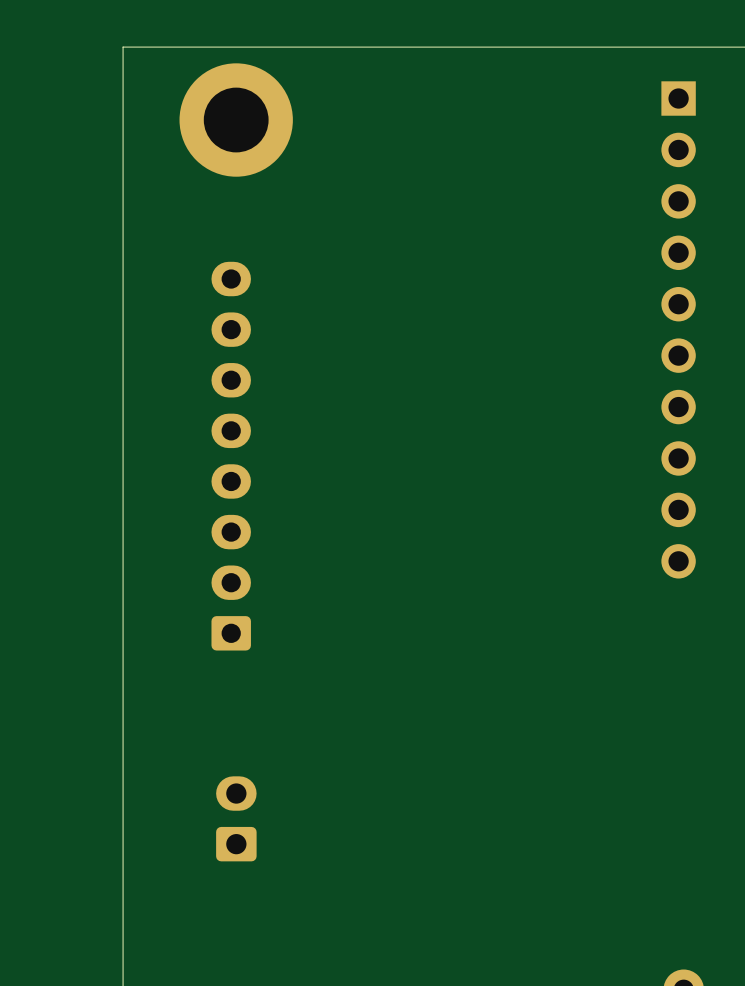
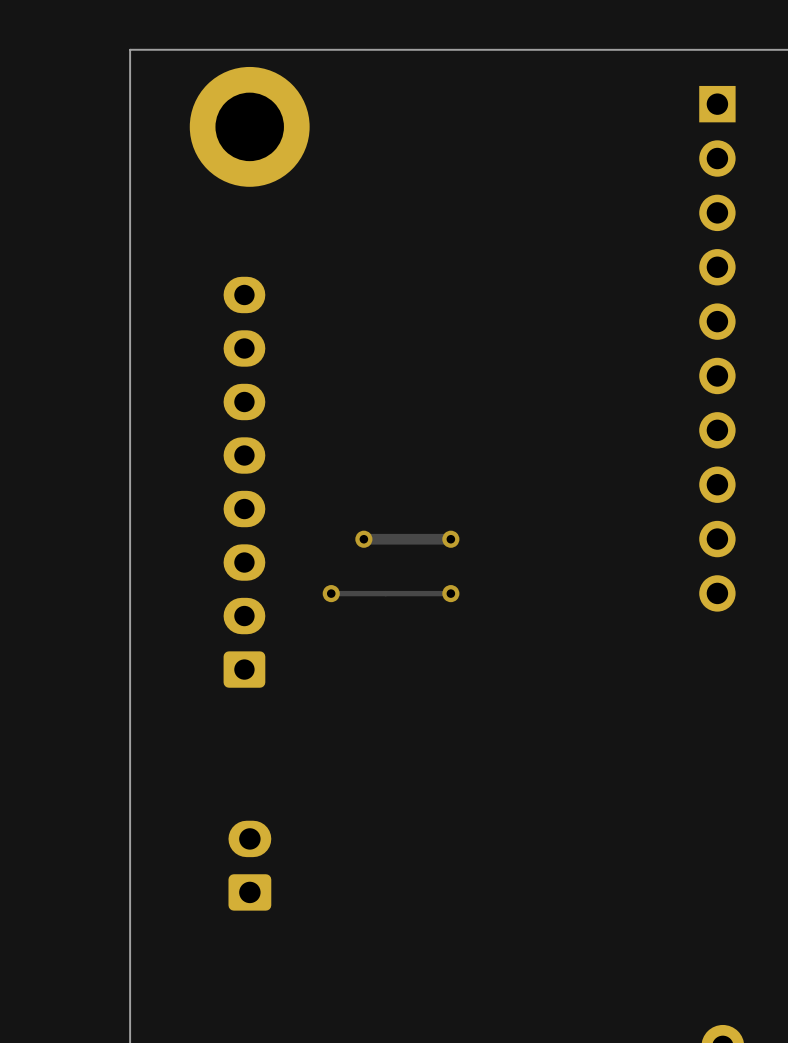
via: none -> (363, 539)
track: none -> (450, 539) (363, 539)
via: none -> (450, 539)
via: none -> (331, 593)
track: none -> (450, 593) (331, 593)
via: none -> (450, 593)

